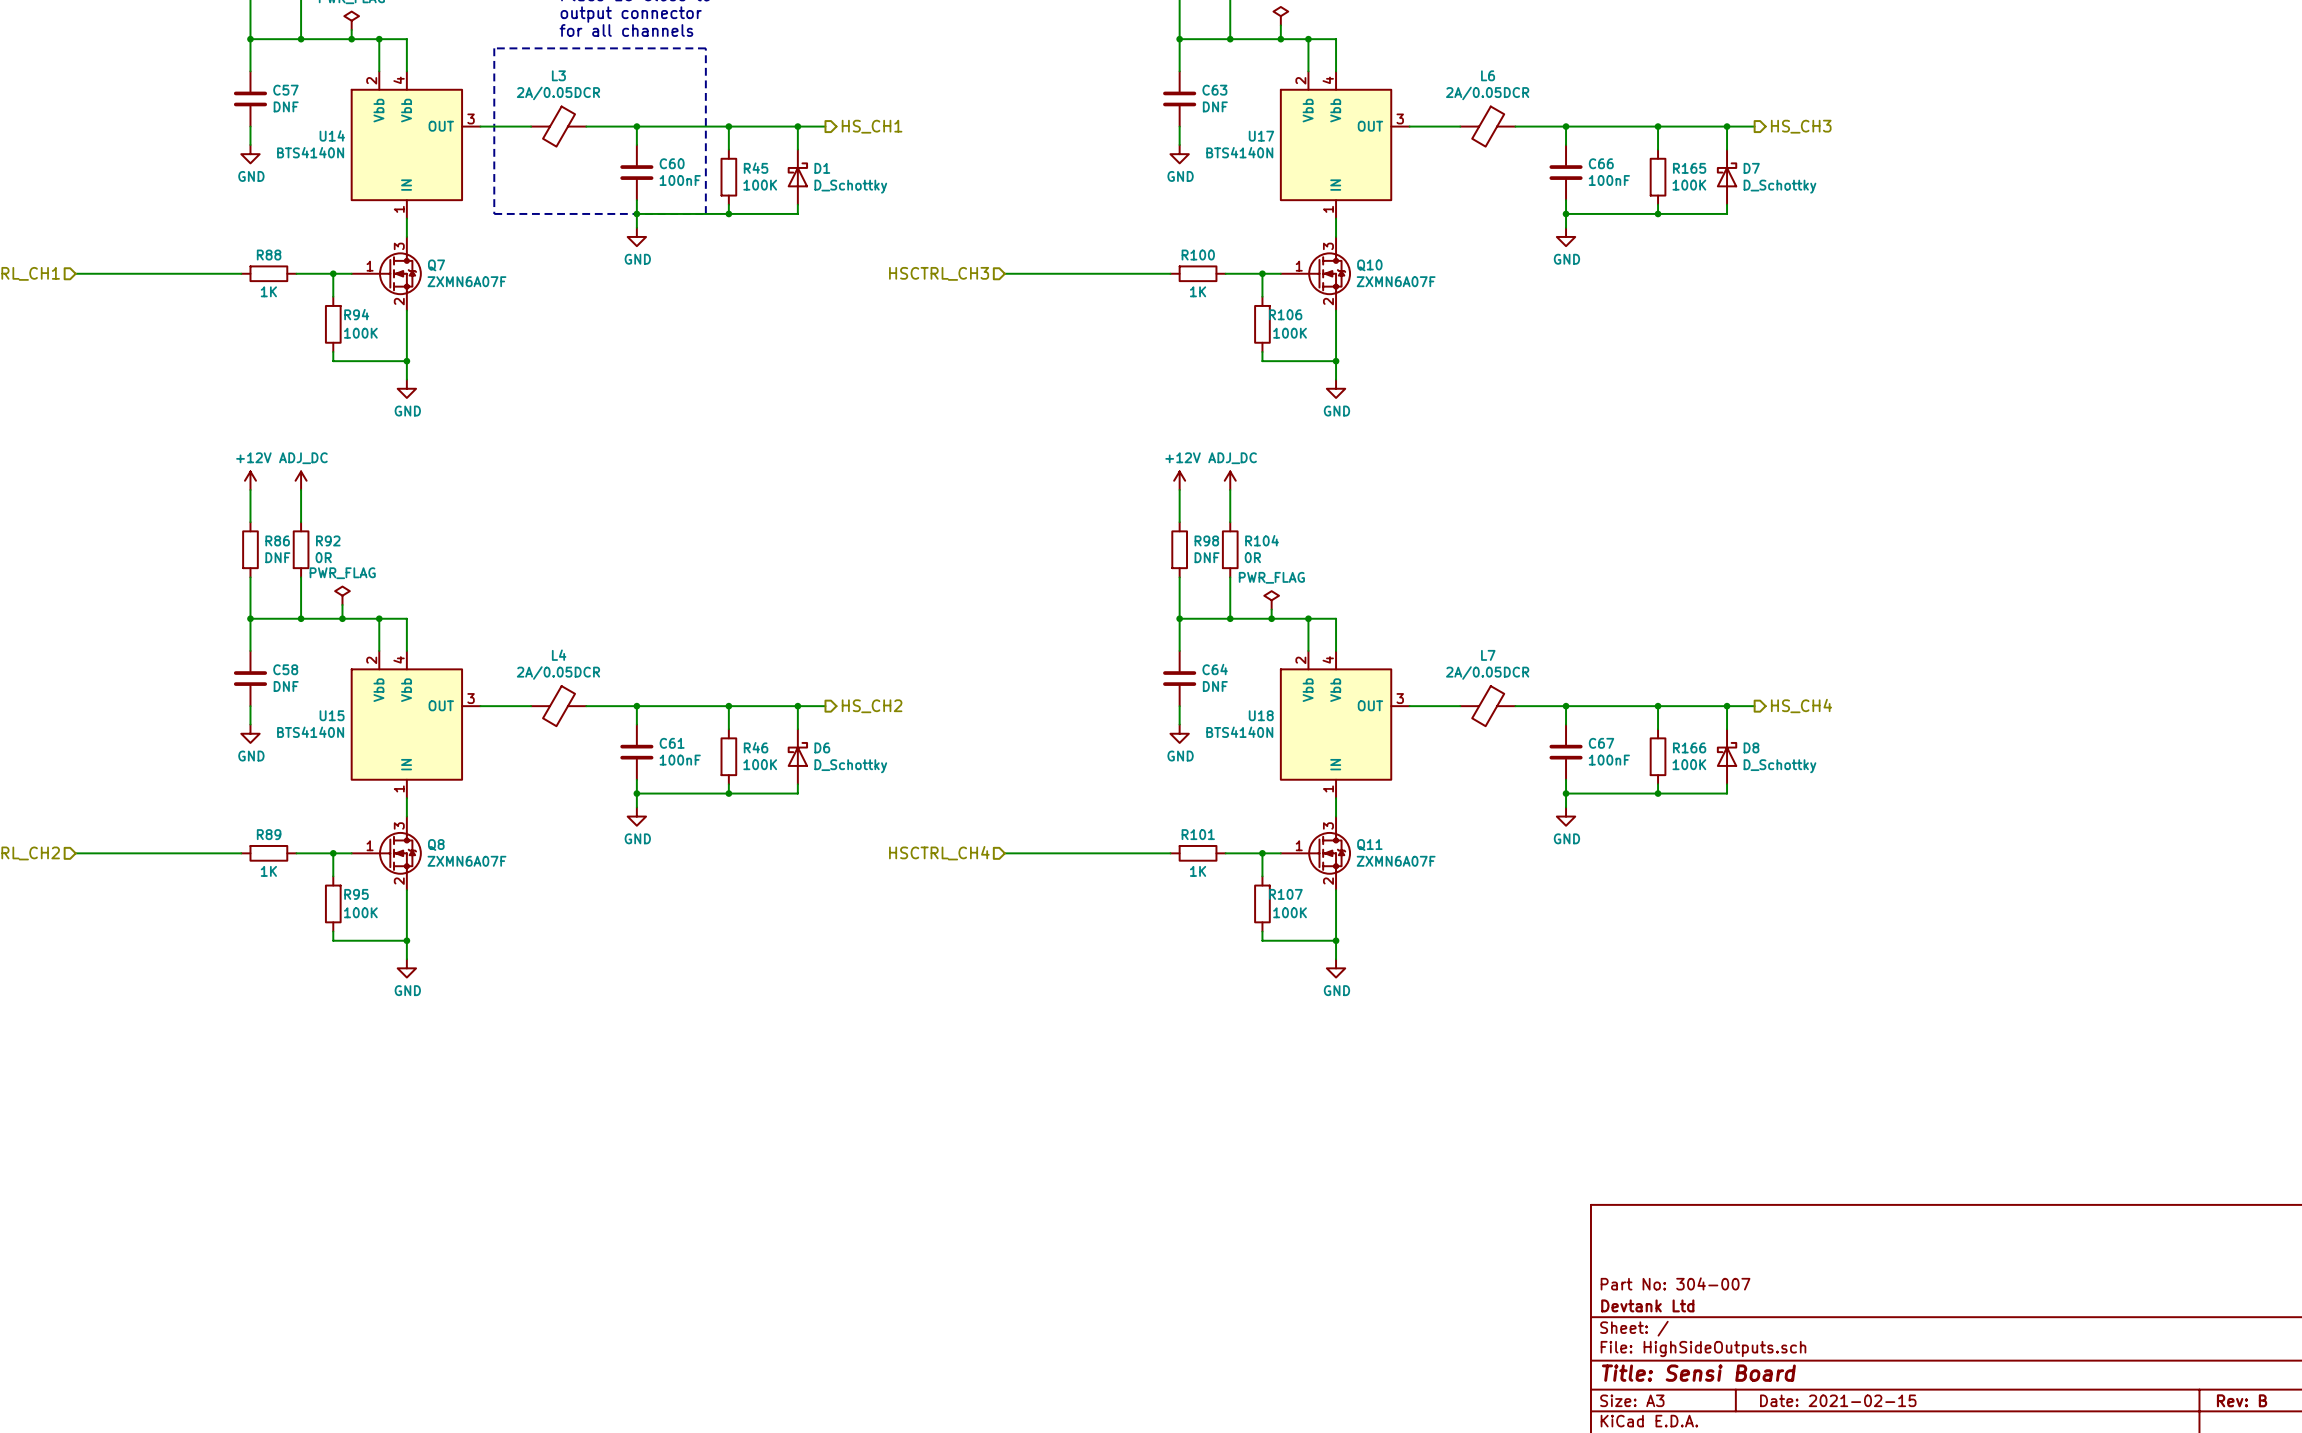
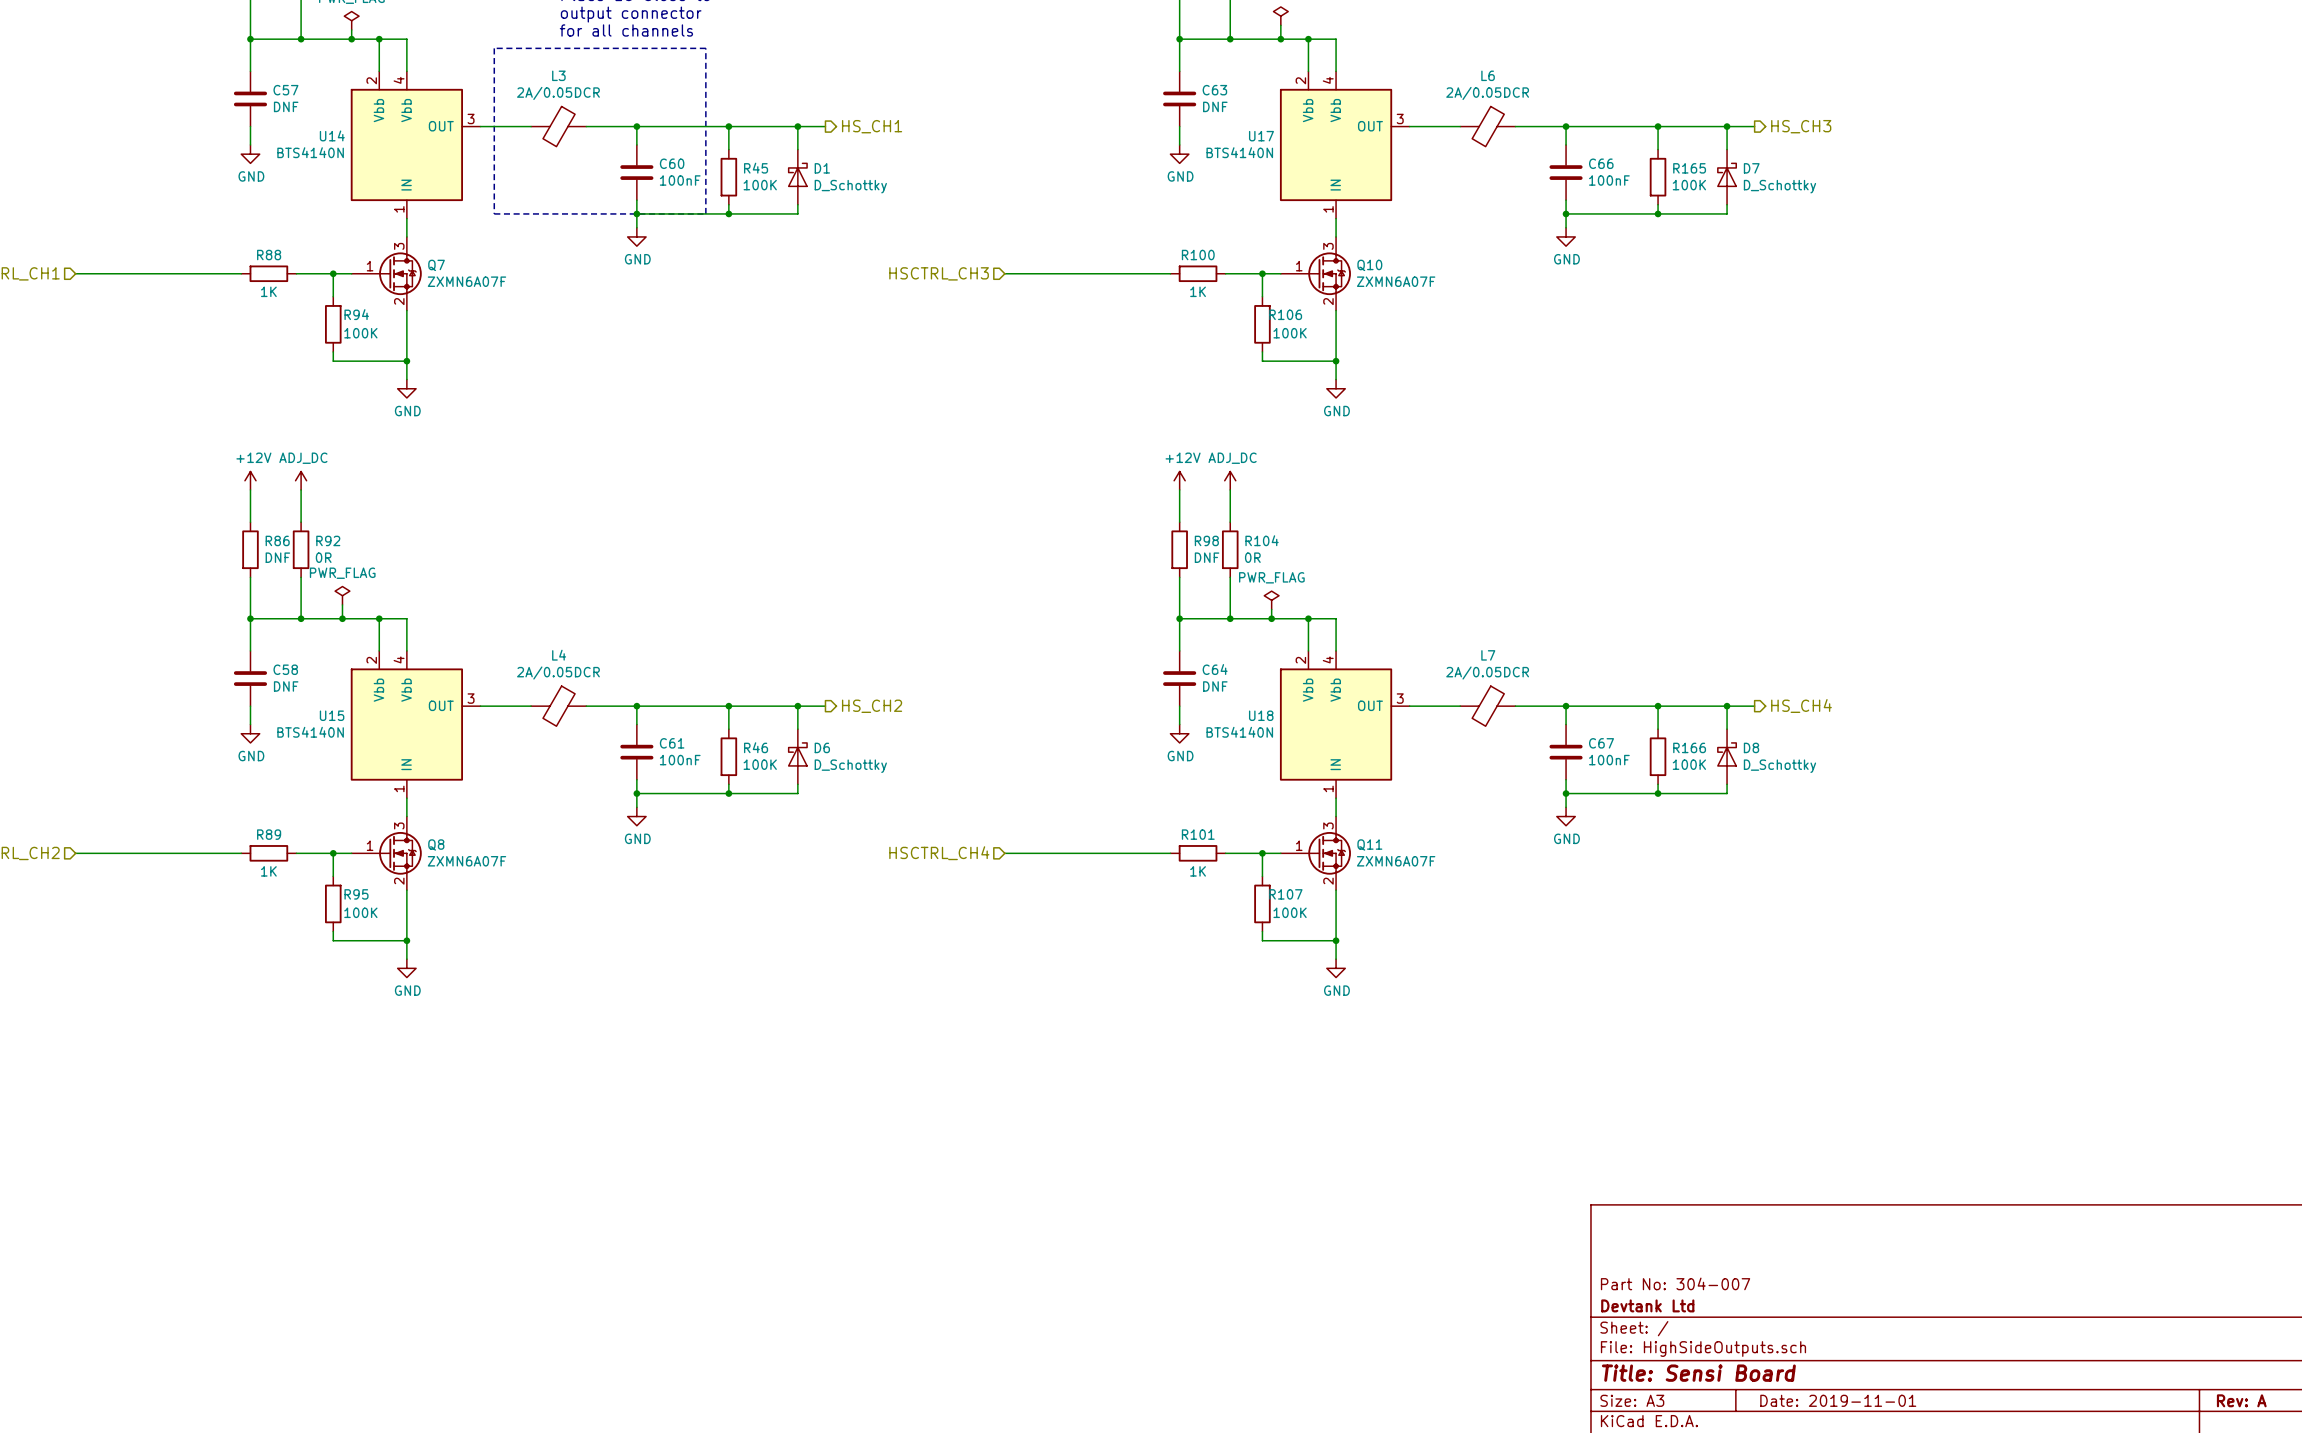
title block: Date: 2021-02-15 (1838, 1400) -> Date: 2019-11-01 (1838, 1400)
title block: Rev: B (2242, 1400) -> Rev: A (2241, 1400)

